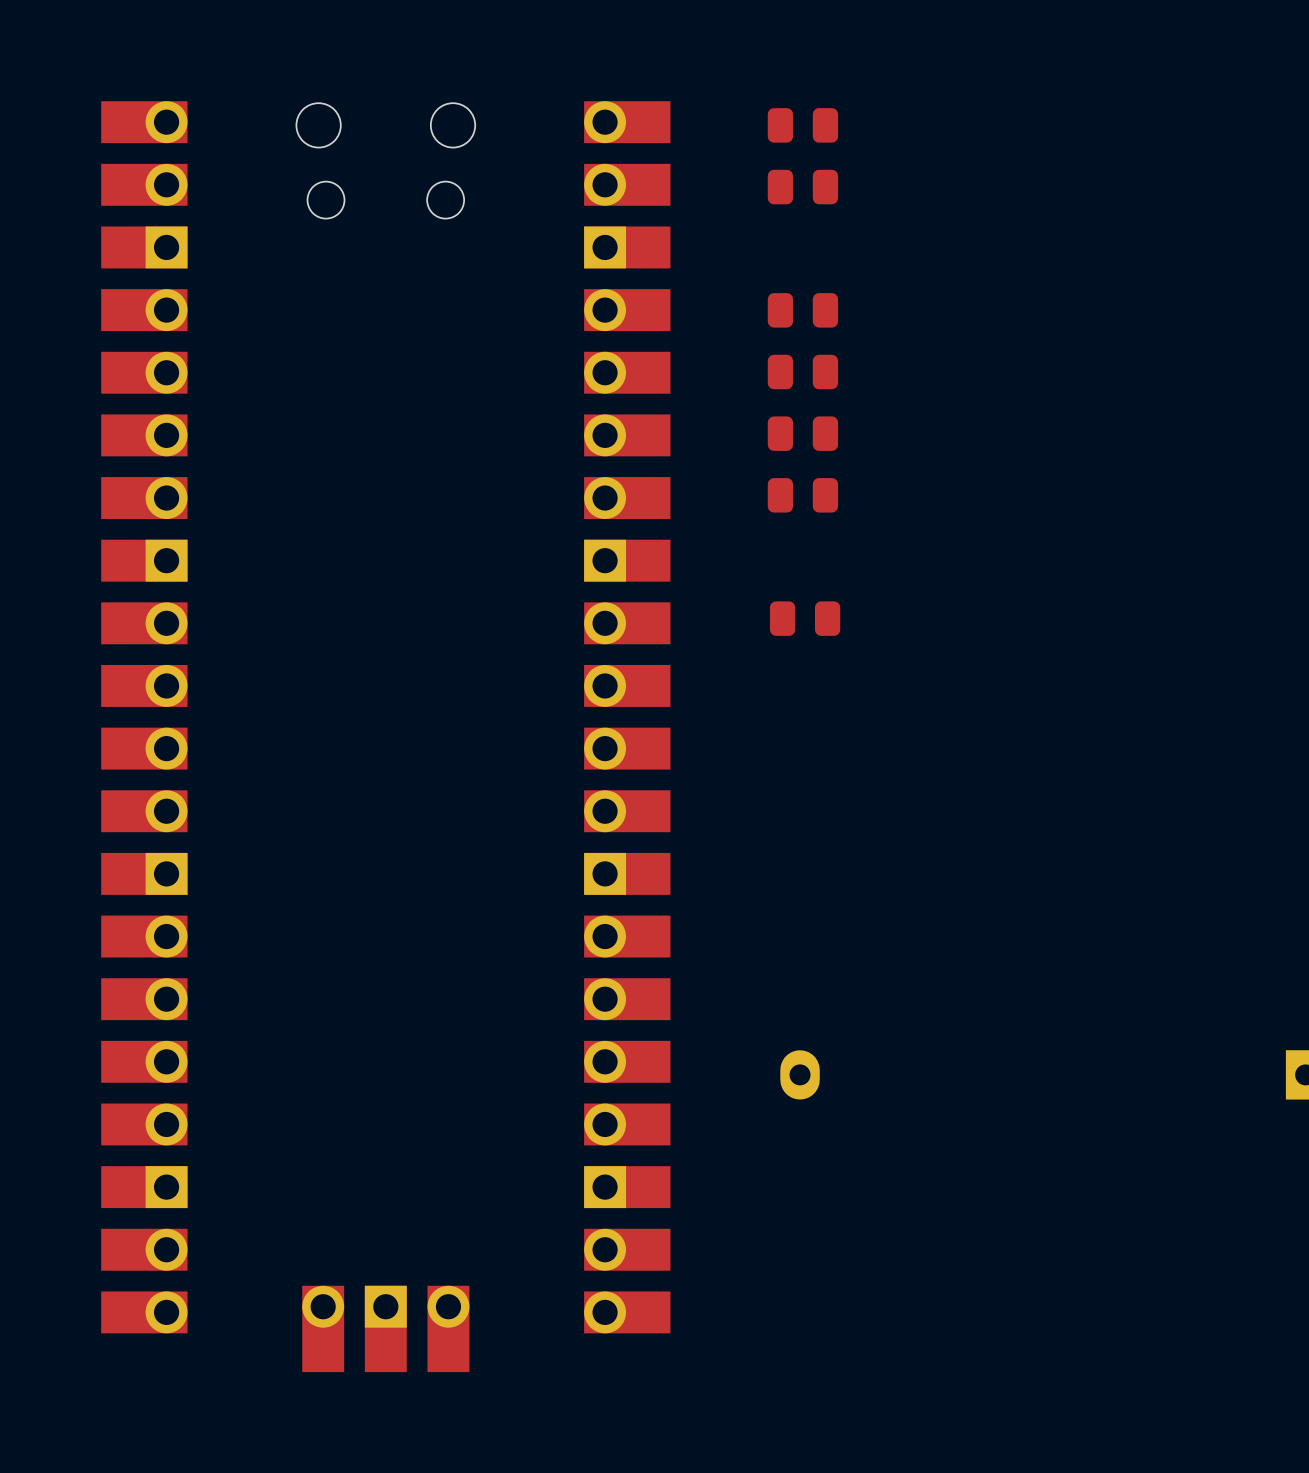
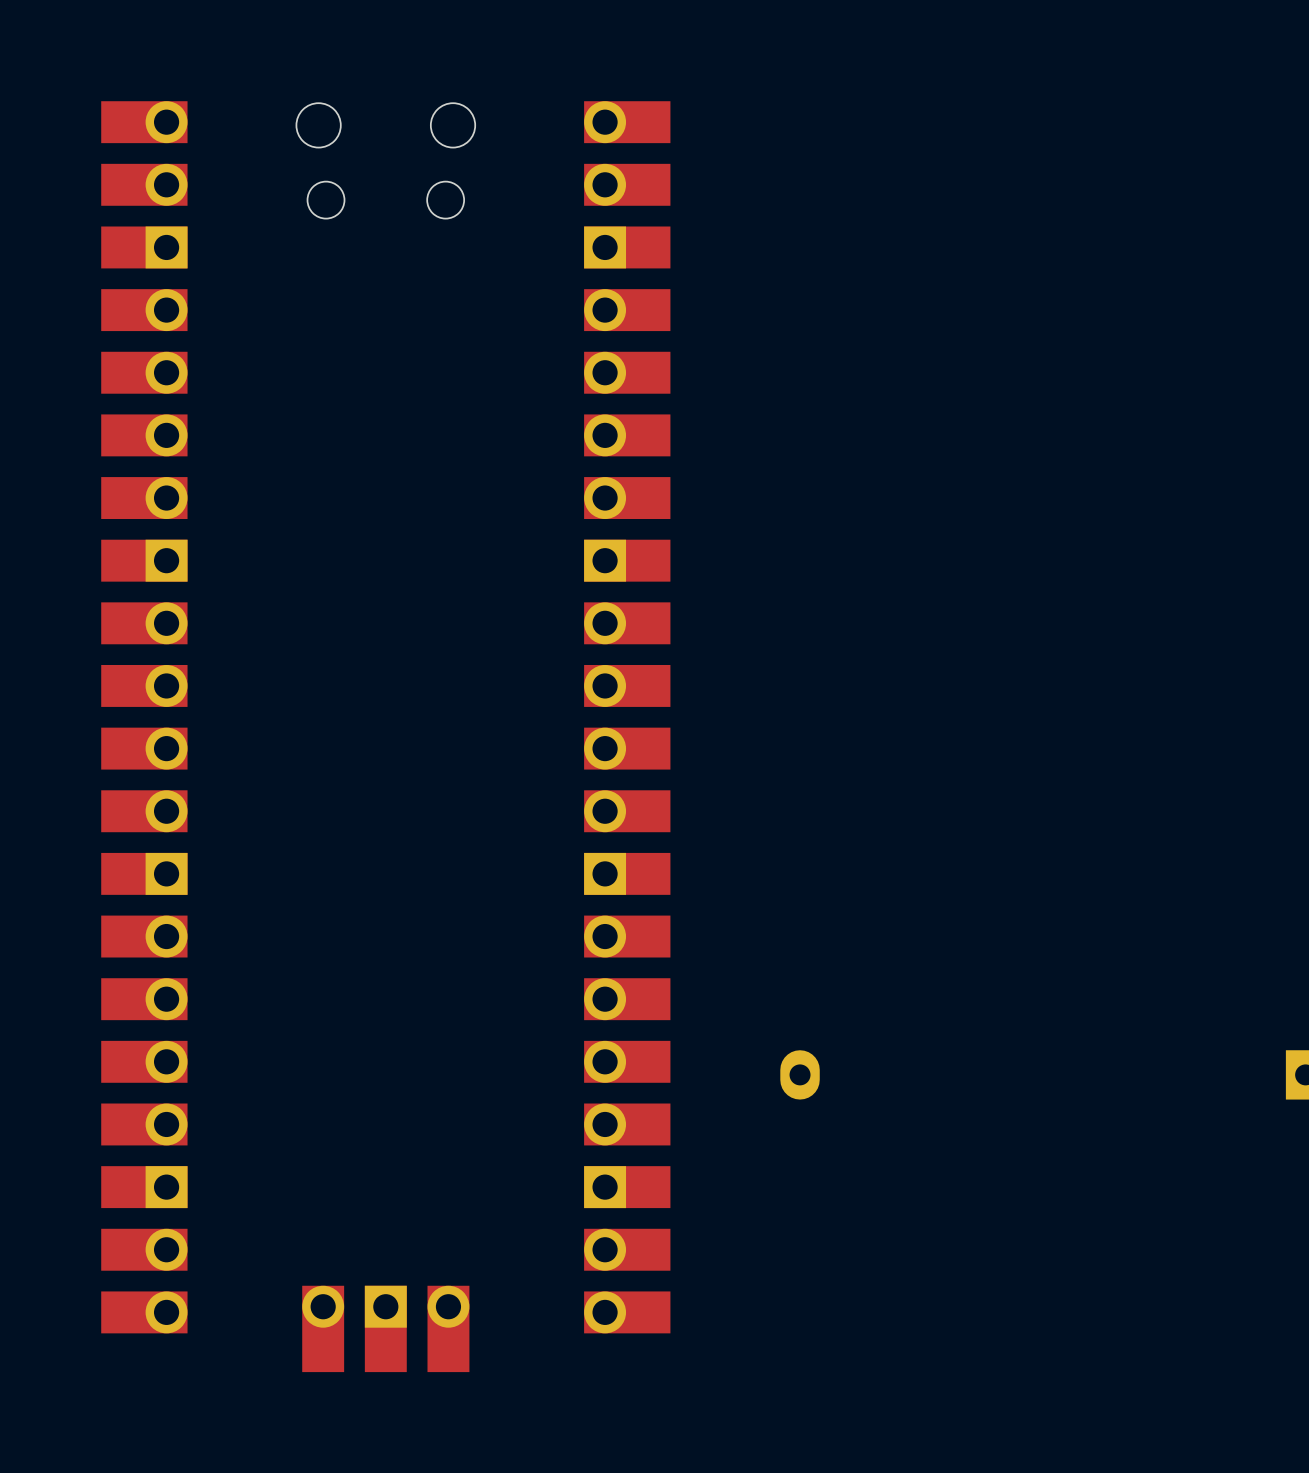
part: (802, 125) -> none
part: (802, 187) -> none
part: (802, 310) -> none
part: (802, 372) -> none
part: (802, 433) -> none
part: (802, 495) -> none
part: (805, 618) -> none

